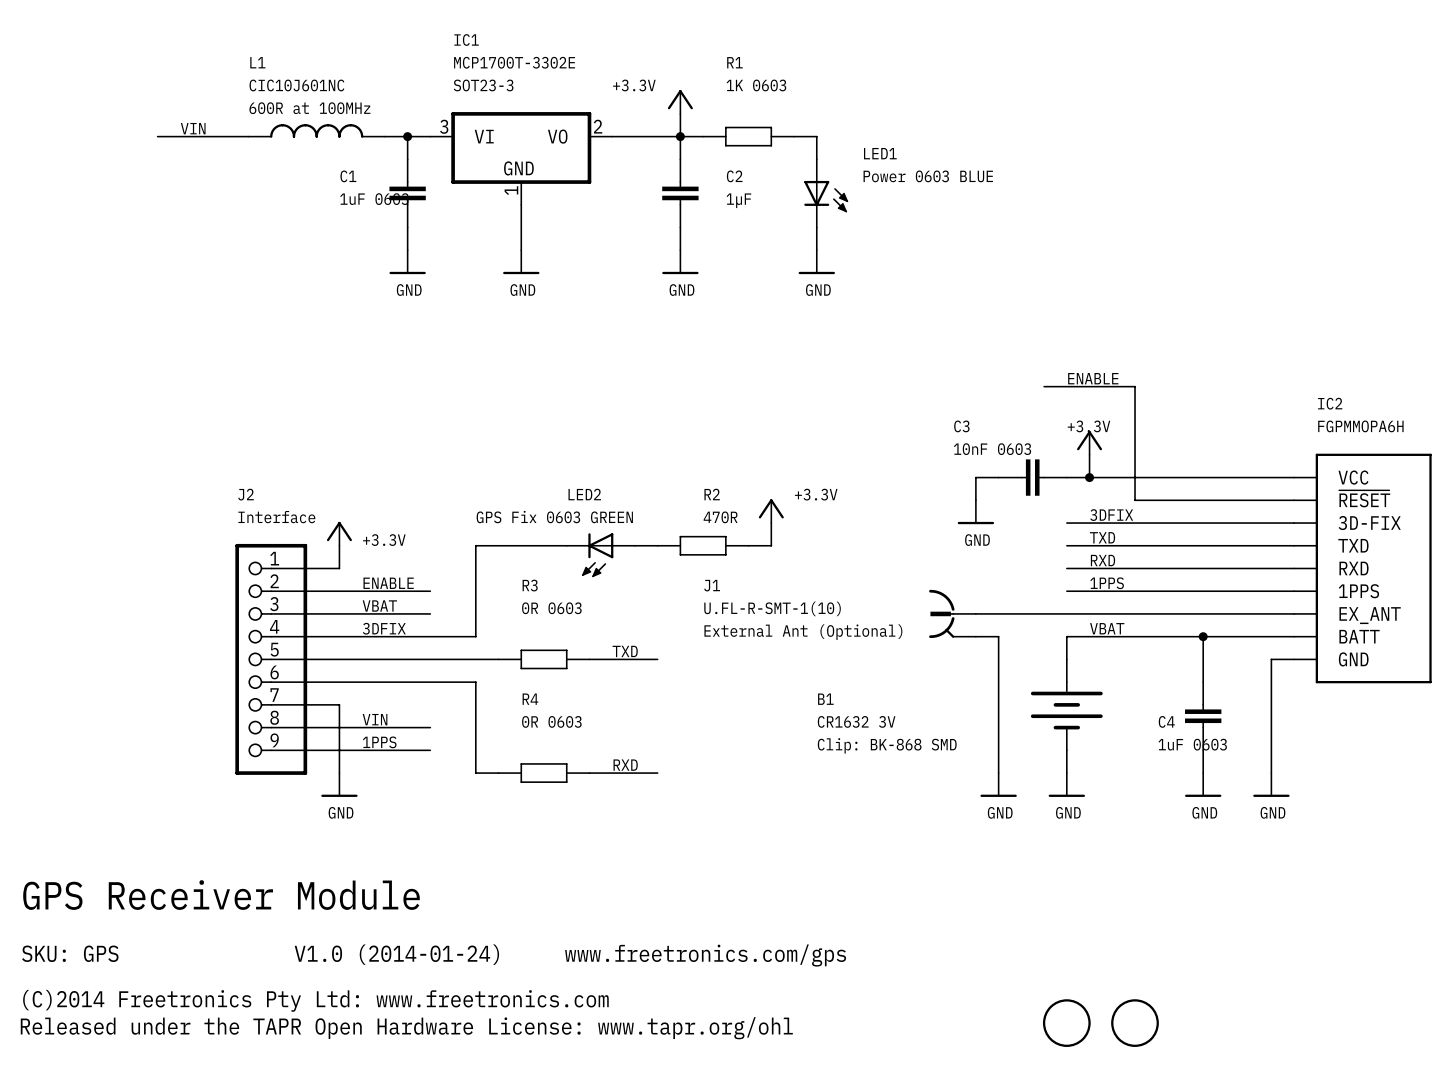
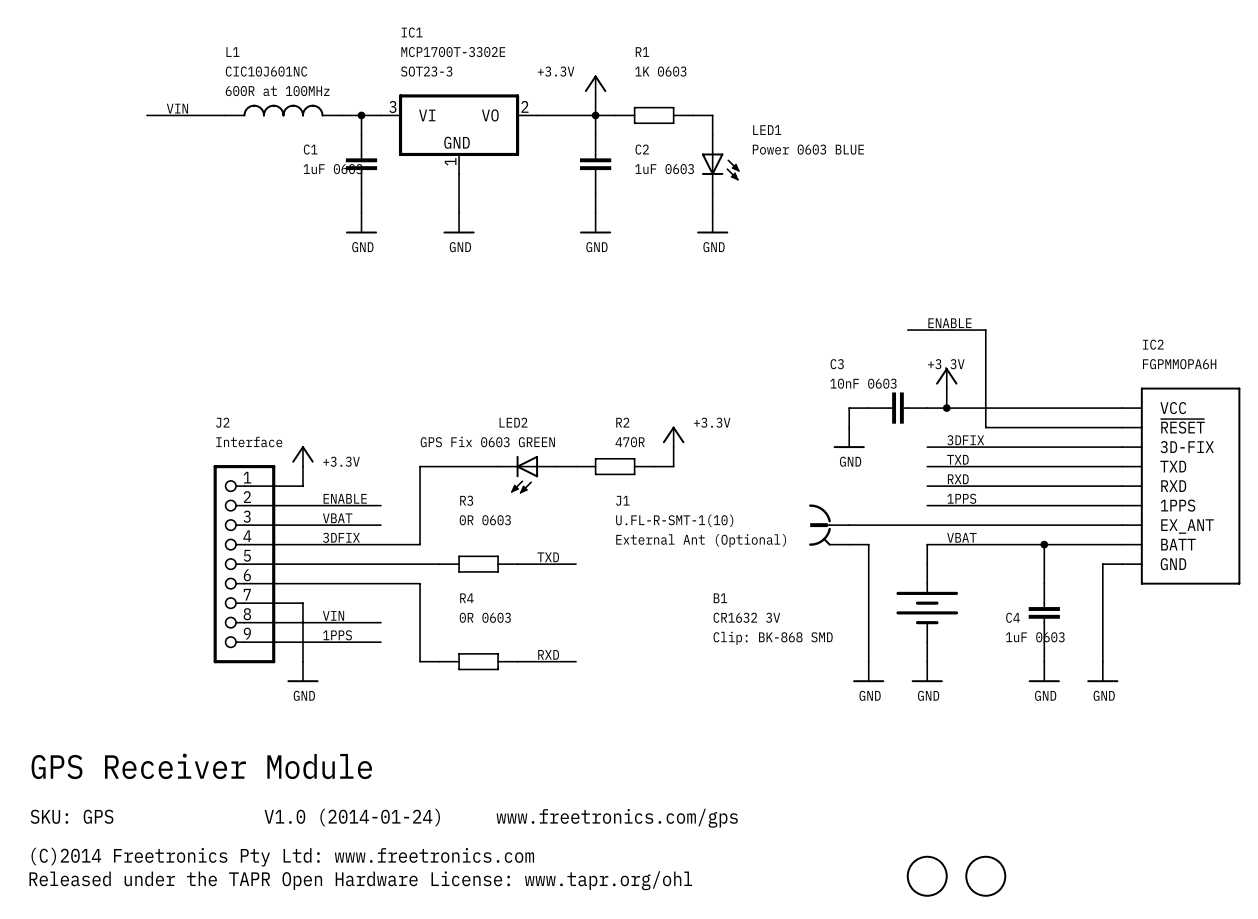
C2 value: 1µF (738, 200) -> 1uF 0603 (664, 169)

